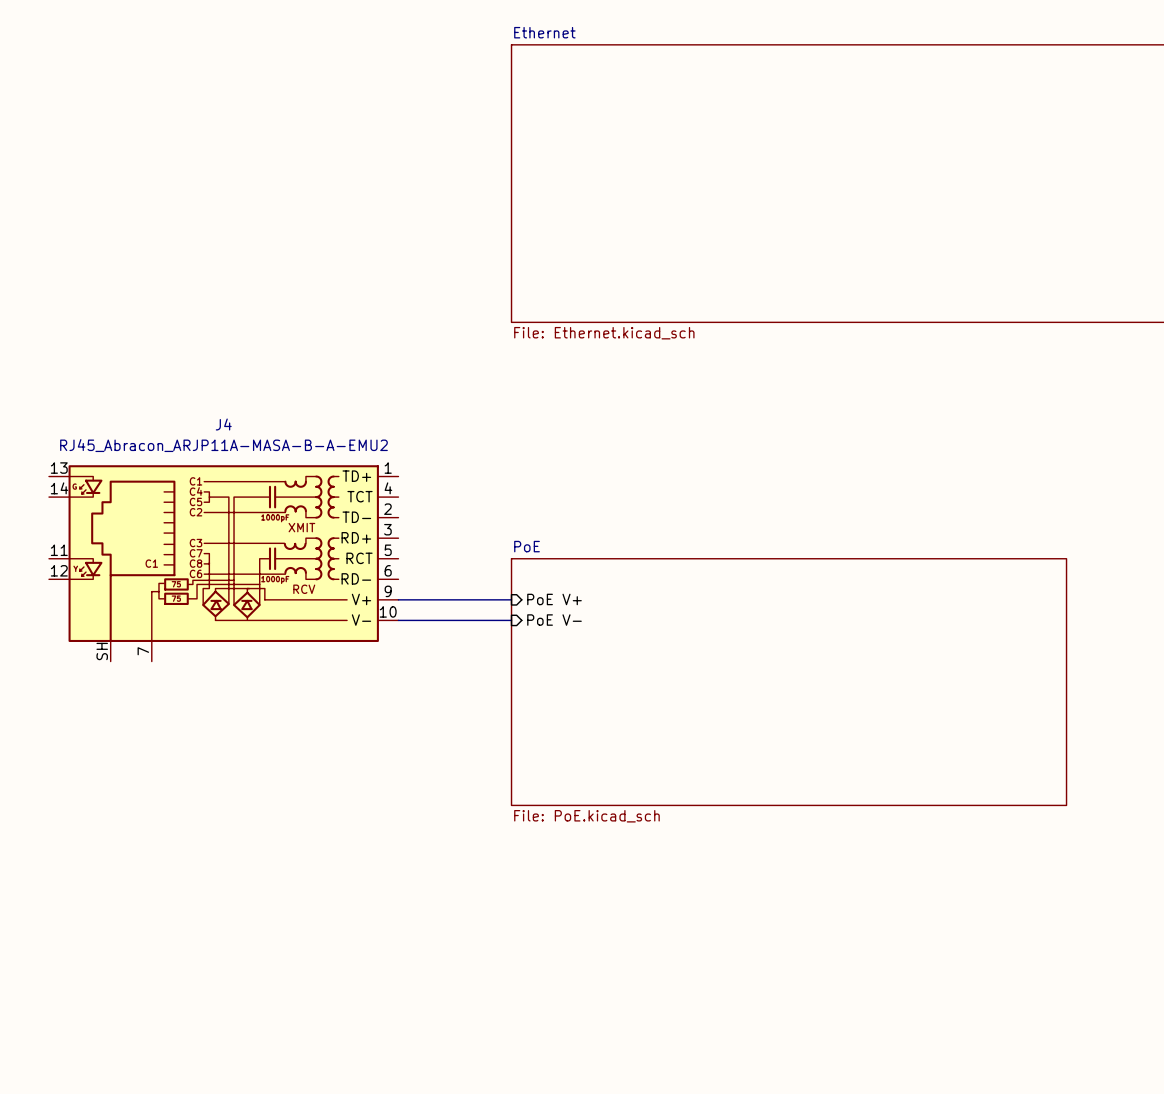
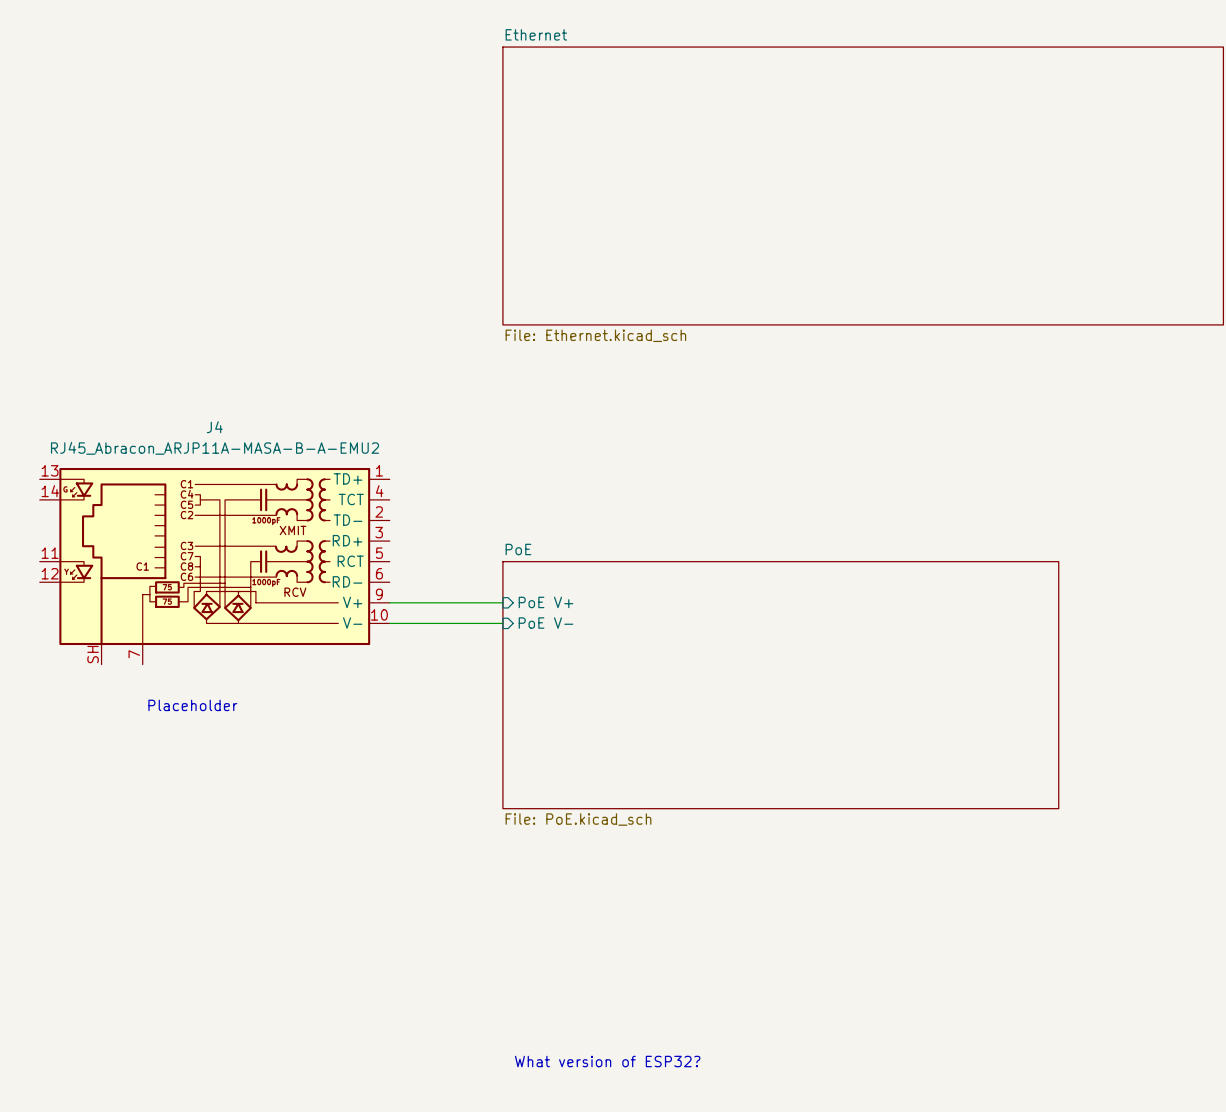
text: none -> Placeholder (192, 705)
text: none -> What version of ESP32? (607, 1061)

